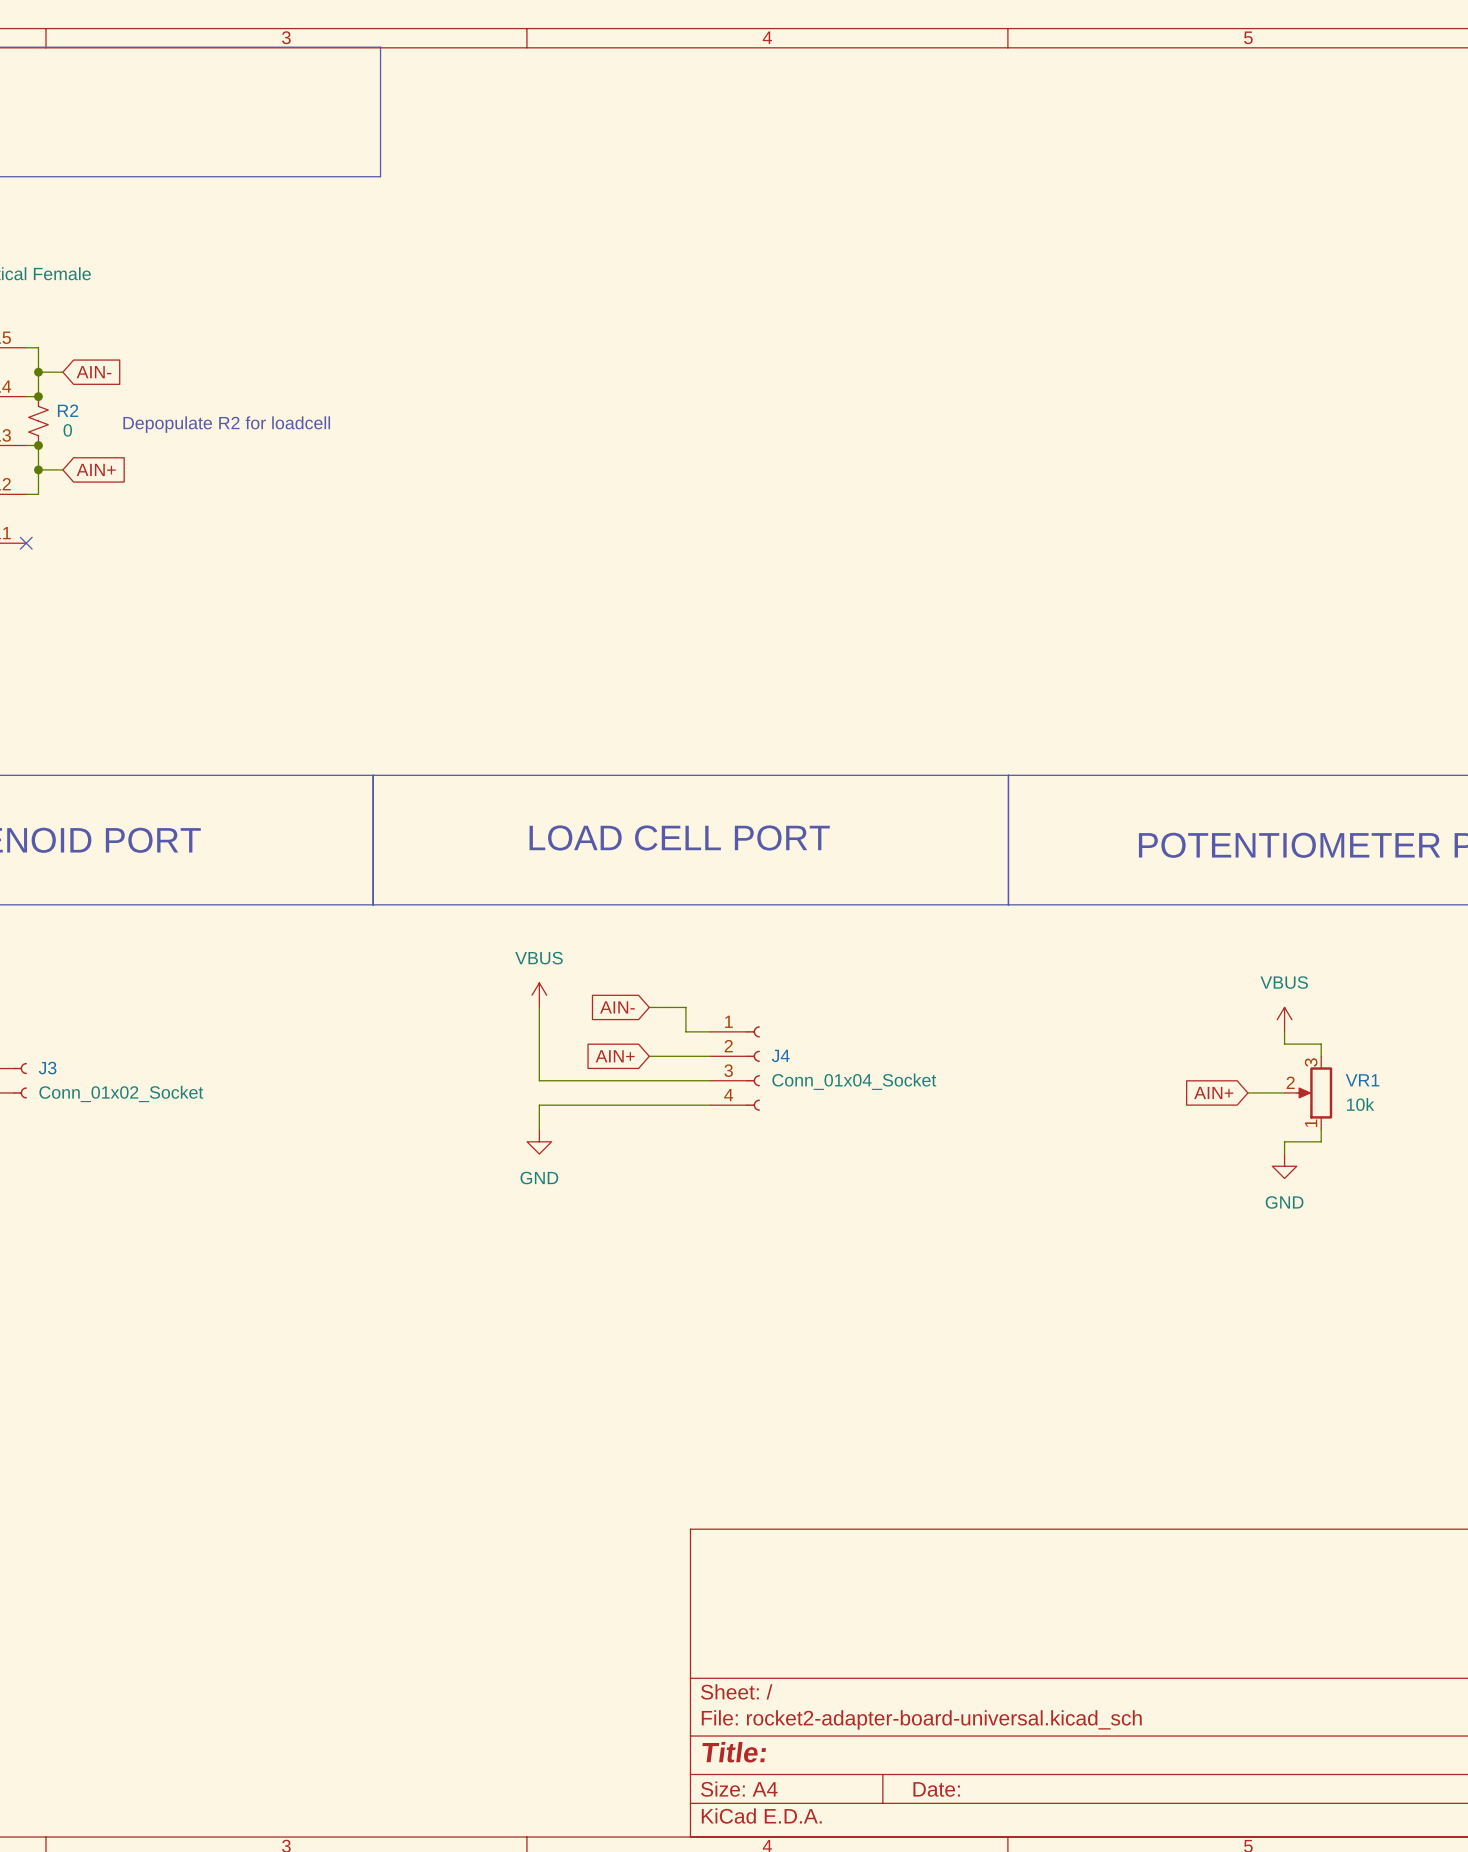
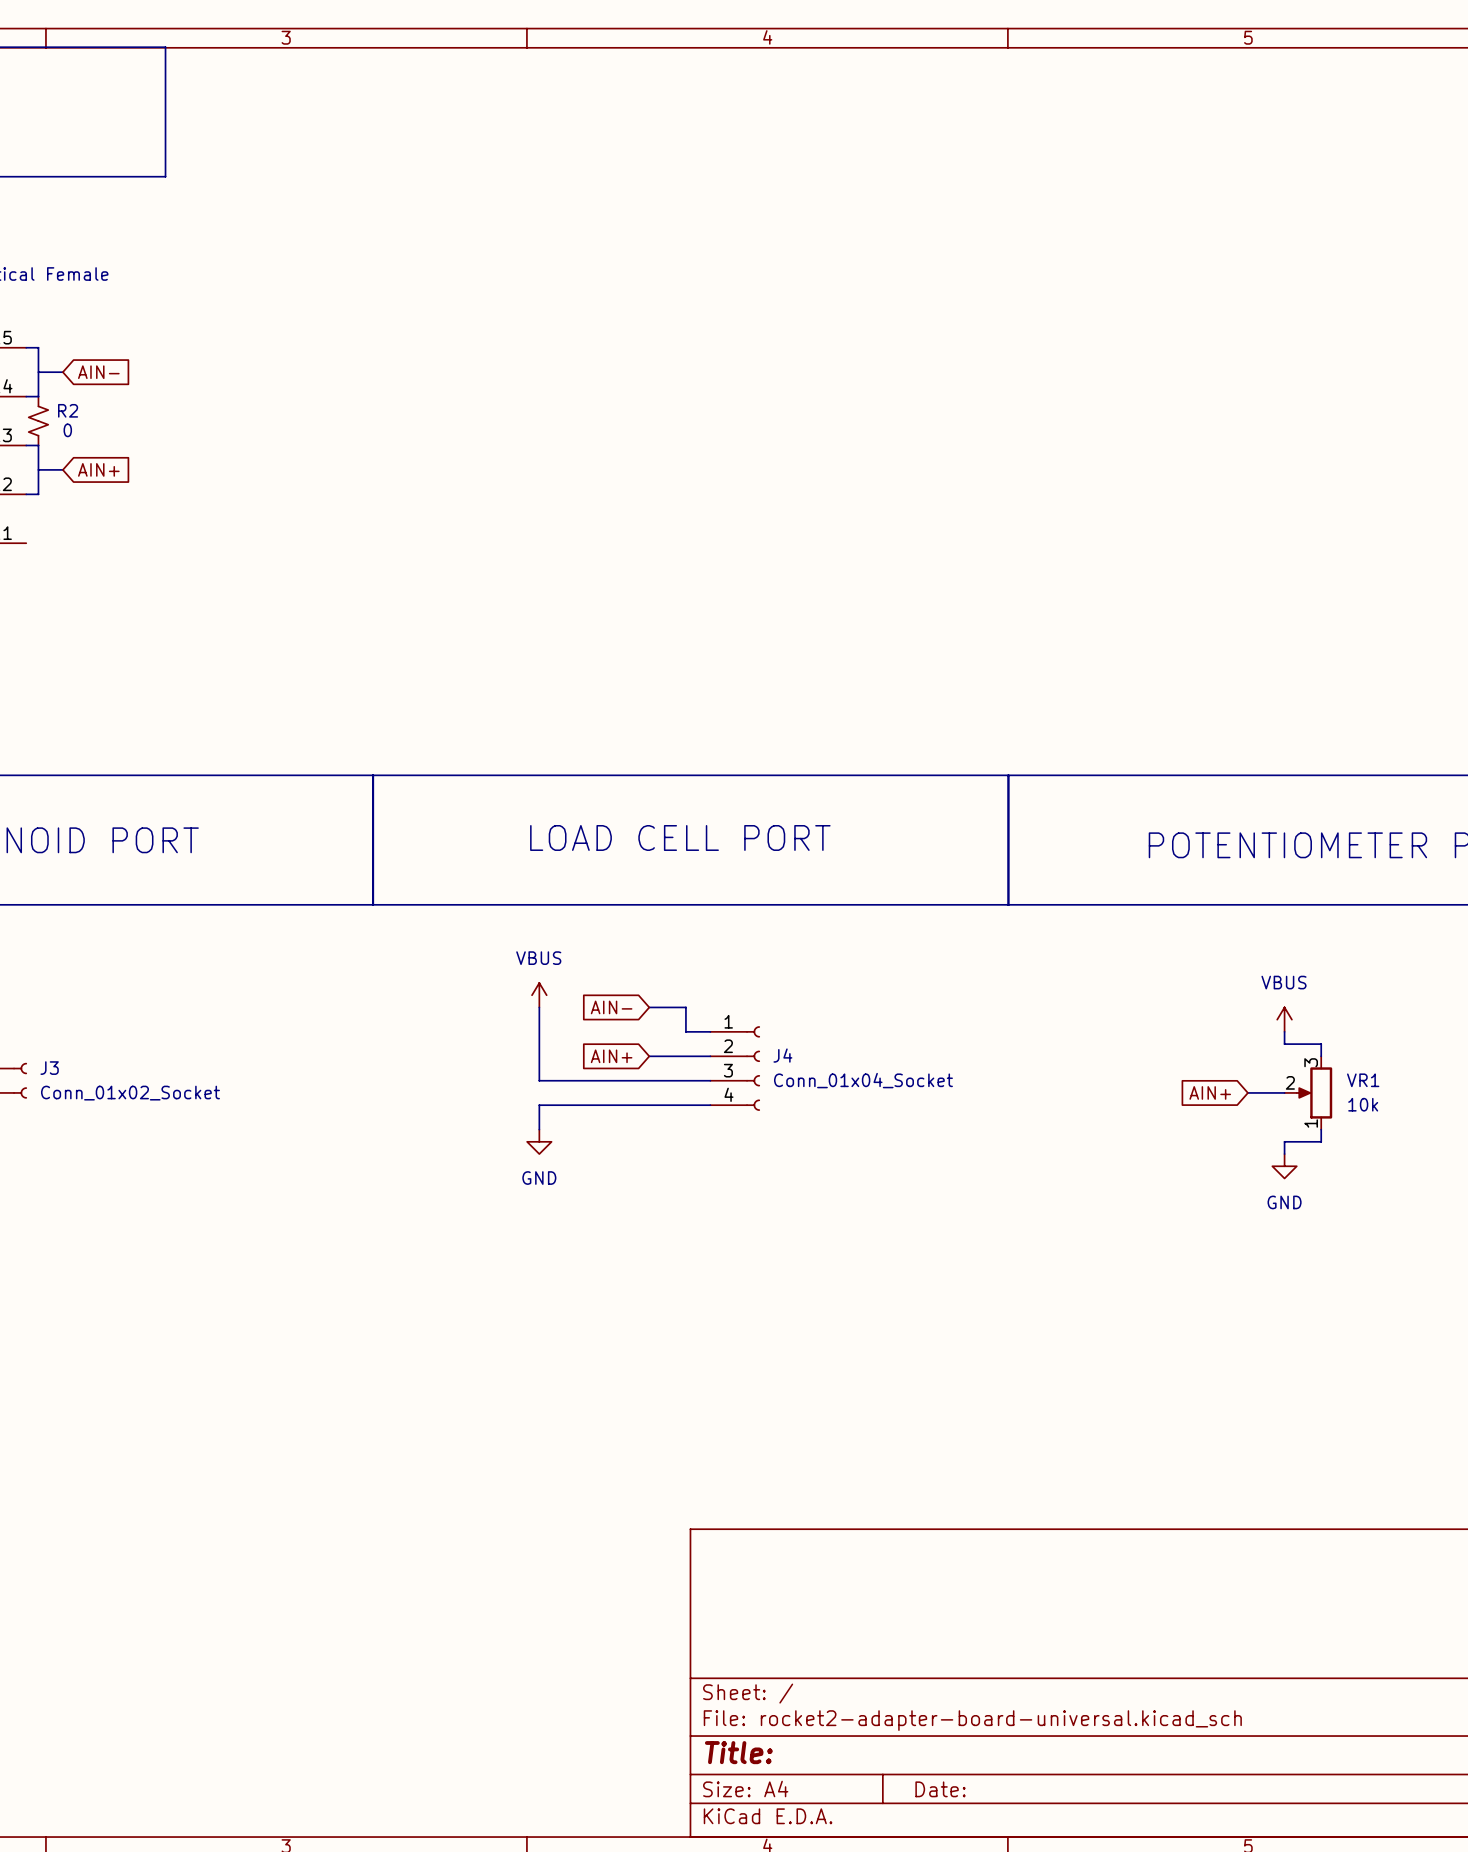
line: (165, 47) (380, 47) (380, 176) (165, 176) -> (165, 47) (165, 176)
junction: (38, 372) -> none
junction: (38, 396) -> none
text: Depopulate R2 for loadcell (226, 424) -> none
junction: (38, 445) -> none
junction: (38, 469) -> none
no-connect mark: (26, 543) -> none

